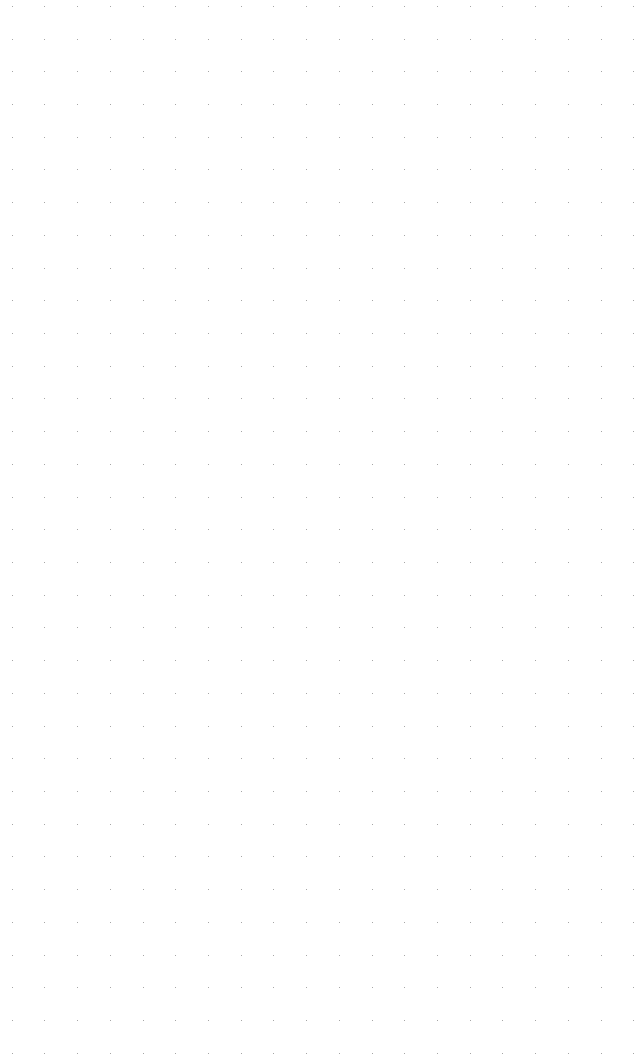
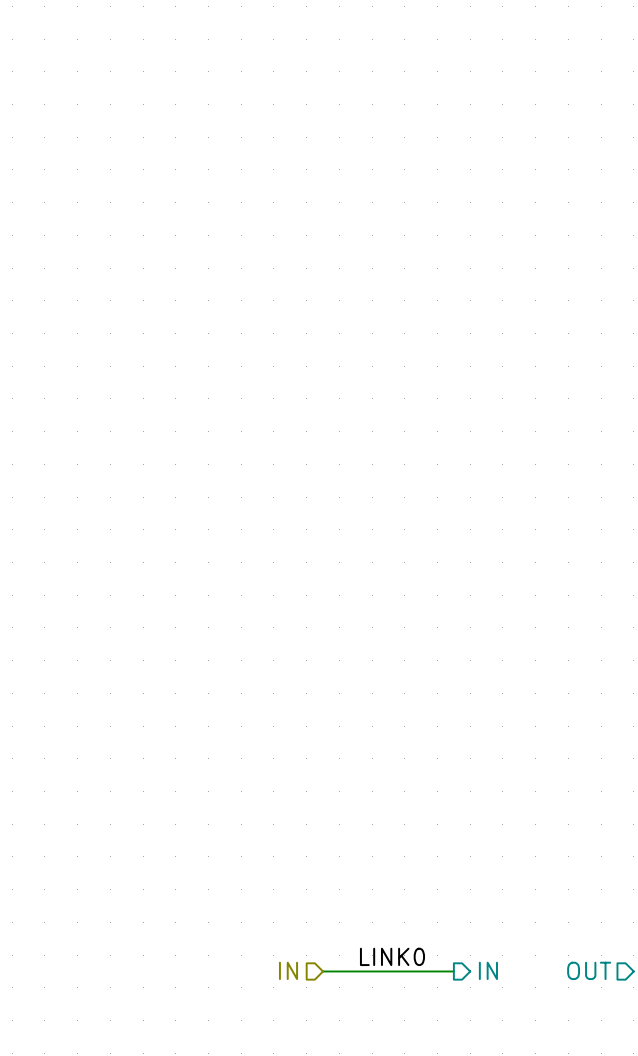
label: none -> LINK0 (392, 956)
hierarchical label: none -> IN (288, 970)
sheet pin: none -> IN (488, 970)
sheet pin: none -> OUT (589, 970)
wire: none -> (323, 971) (453, 971)

